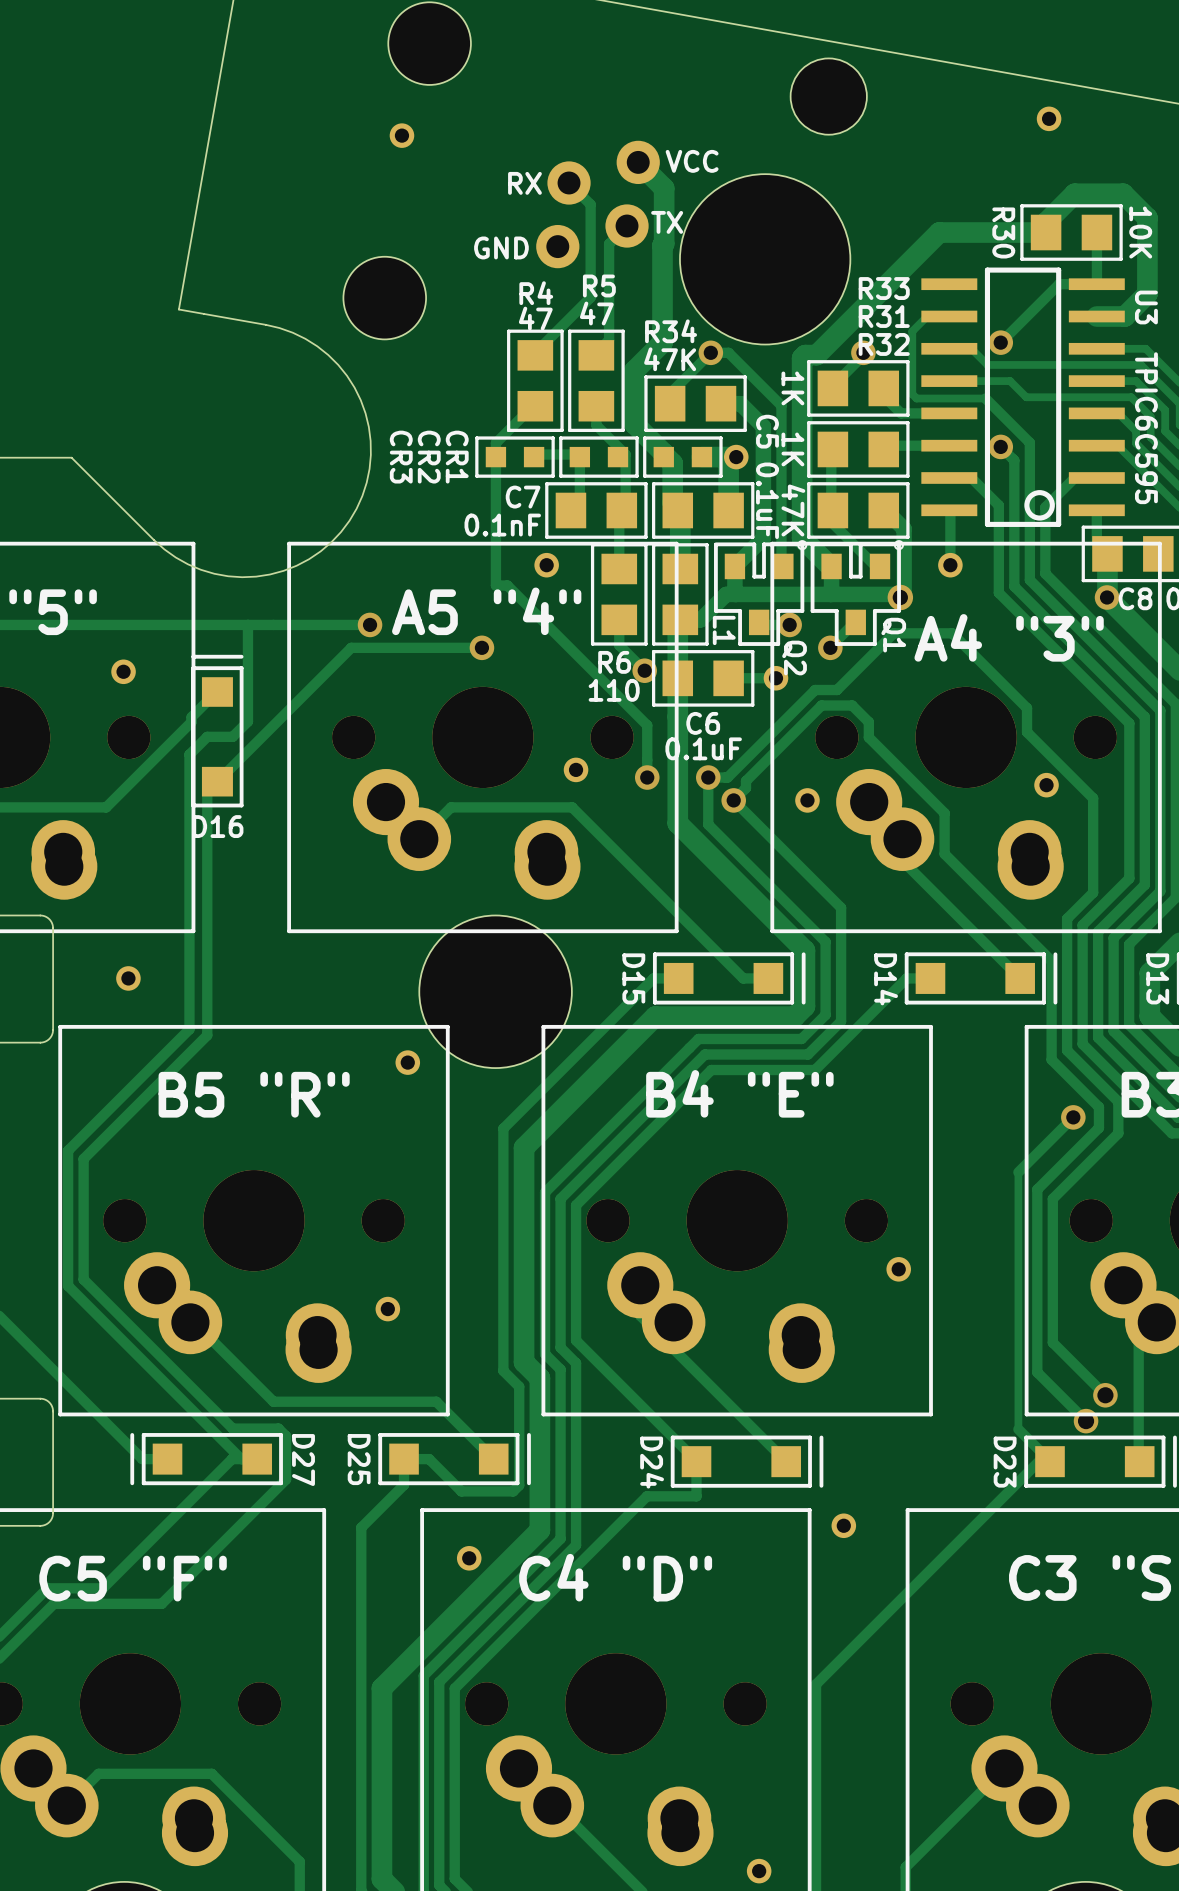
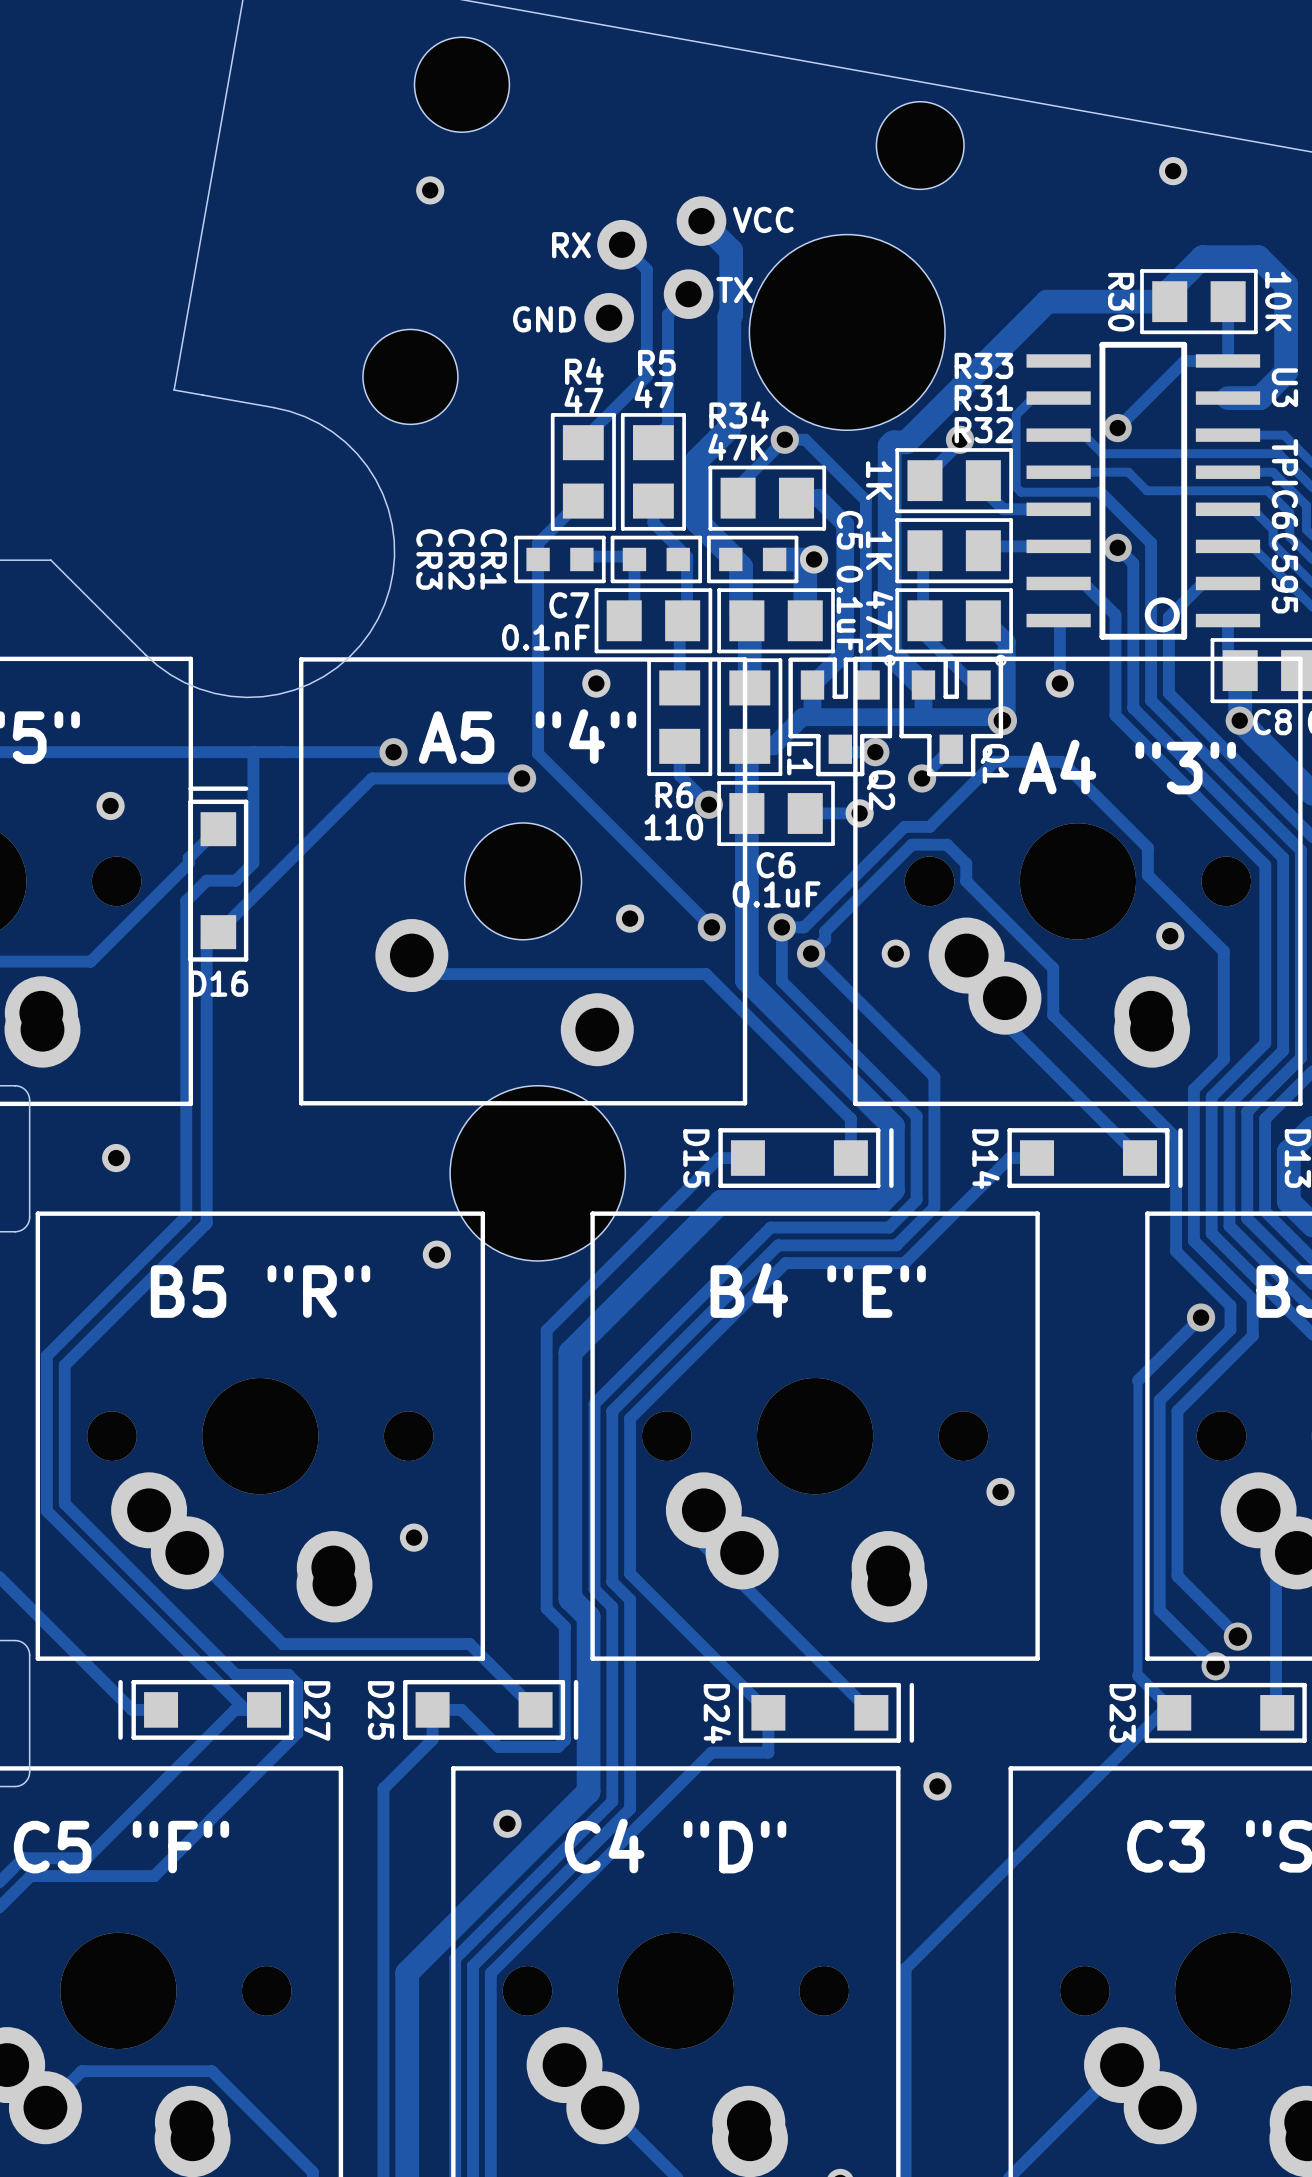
part footprint: [287, 541, 679, 934] -> [299, 657, 748, 1106]
track: (495, 585) (507, 585) (647, 725) (647, 777) -> (538, 706) (538, 753) (711, 927)
track: (419, 839) (451, 807) (572, 807) (743, 978) (768, 978) -> (430, 974) (705, 974) (850, 1119) (850, 1158)

